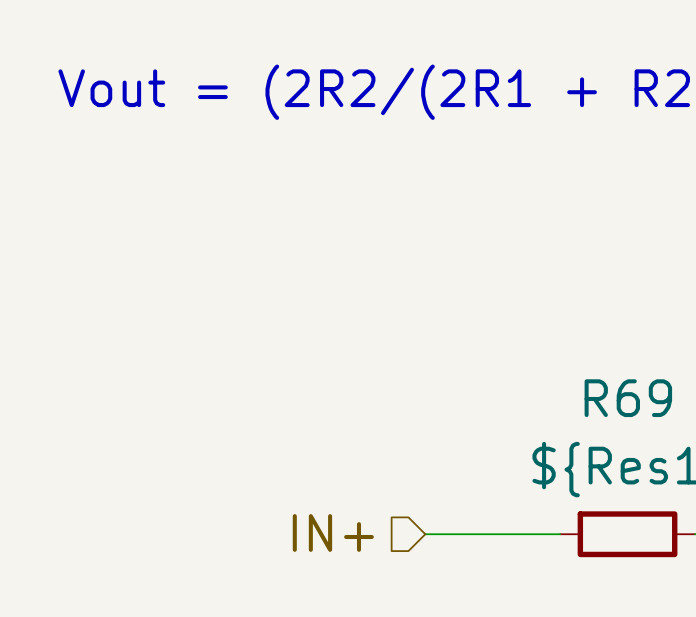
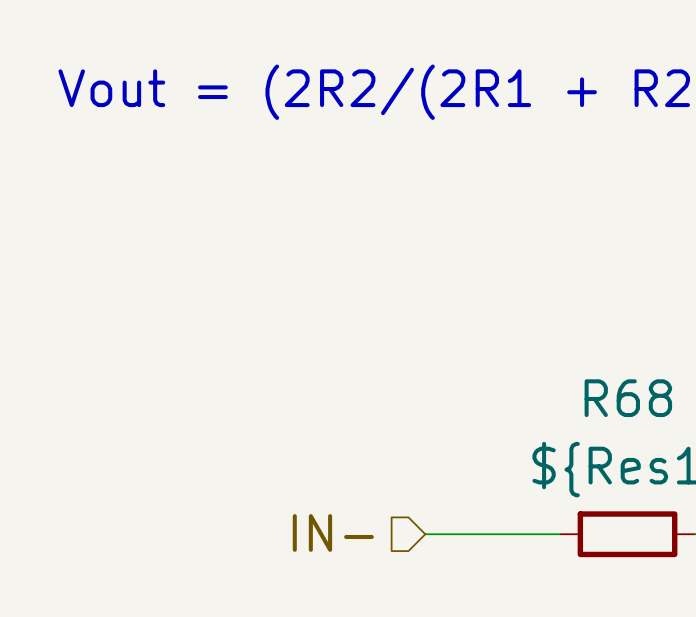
R69 name: R69 (628, 398) -> R68 (628, 398)
hierarchical label: IN+ (333, 532) -> IN- (333, 532)

